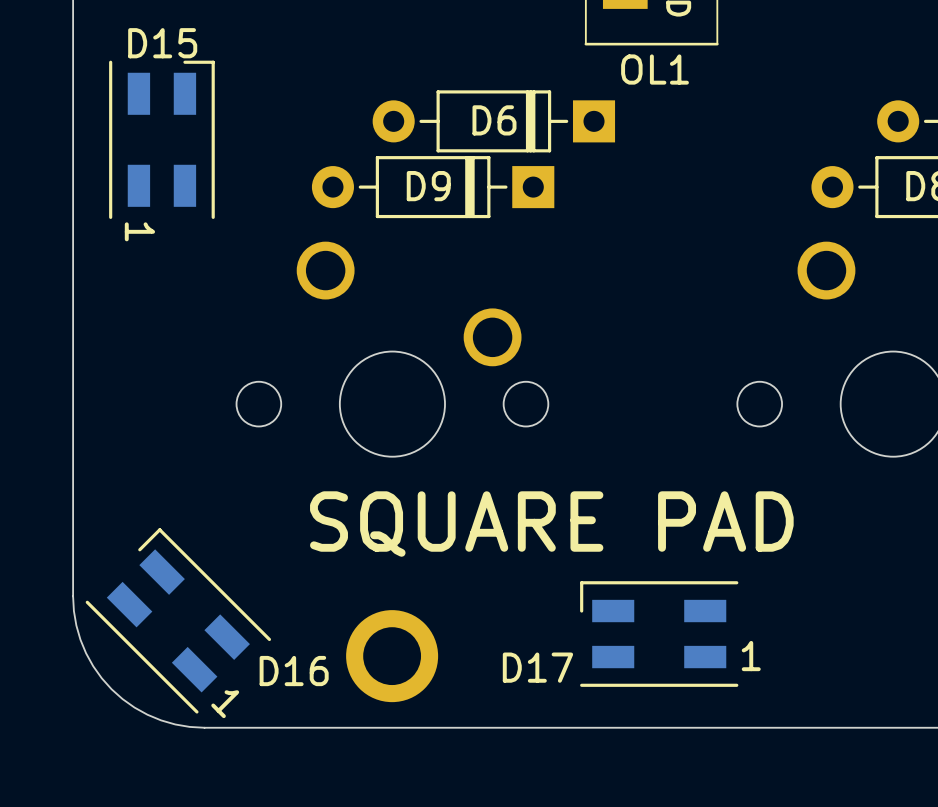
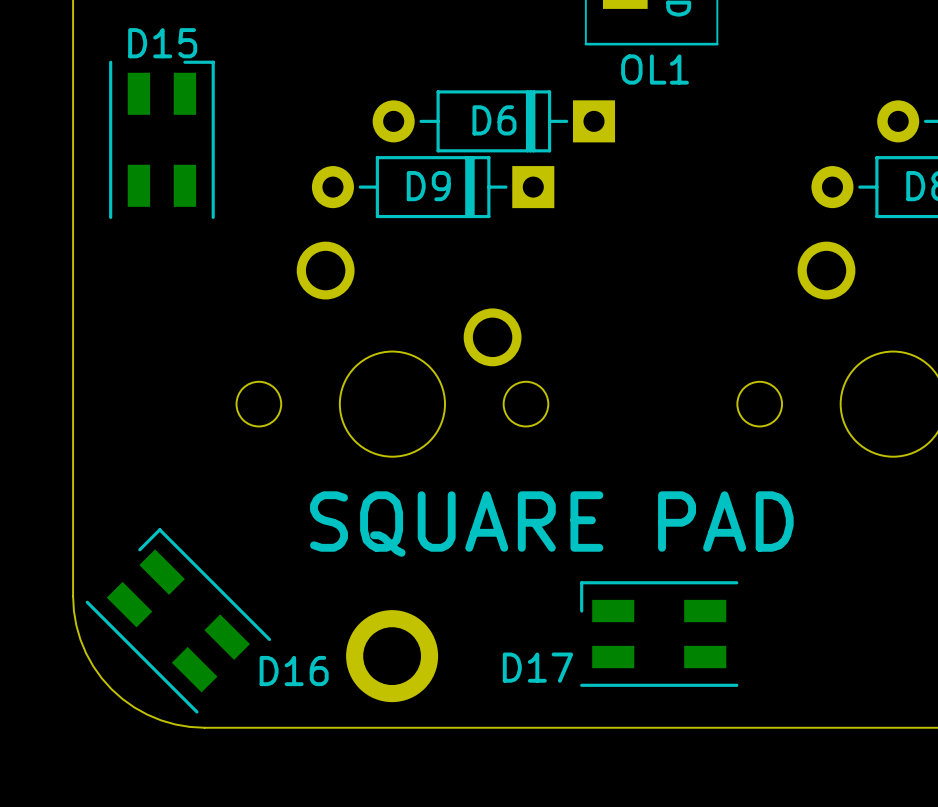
D15 text: 1 (139, 231) -> none
D17 text: 1 (751, 656) -> none
D16 text: 1 (225, 704) -> none

